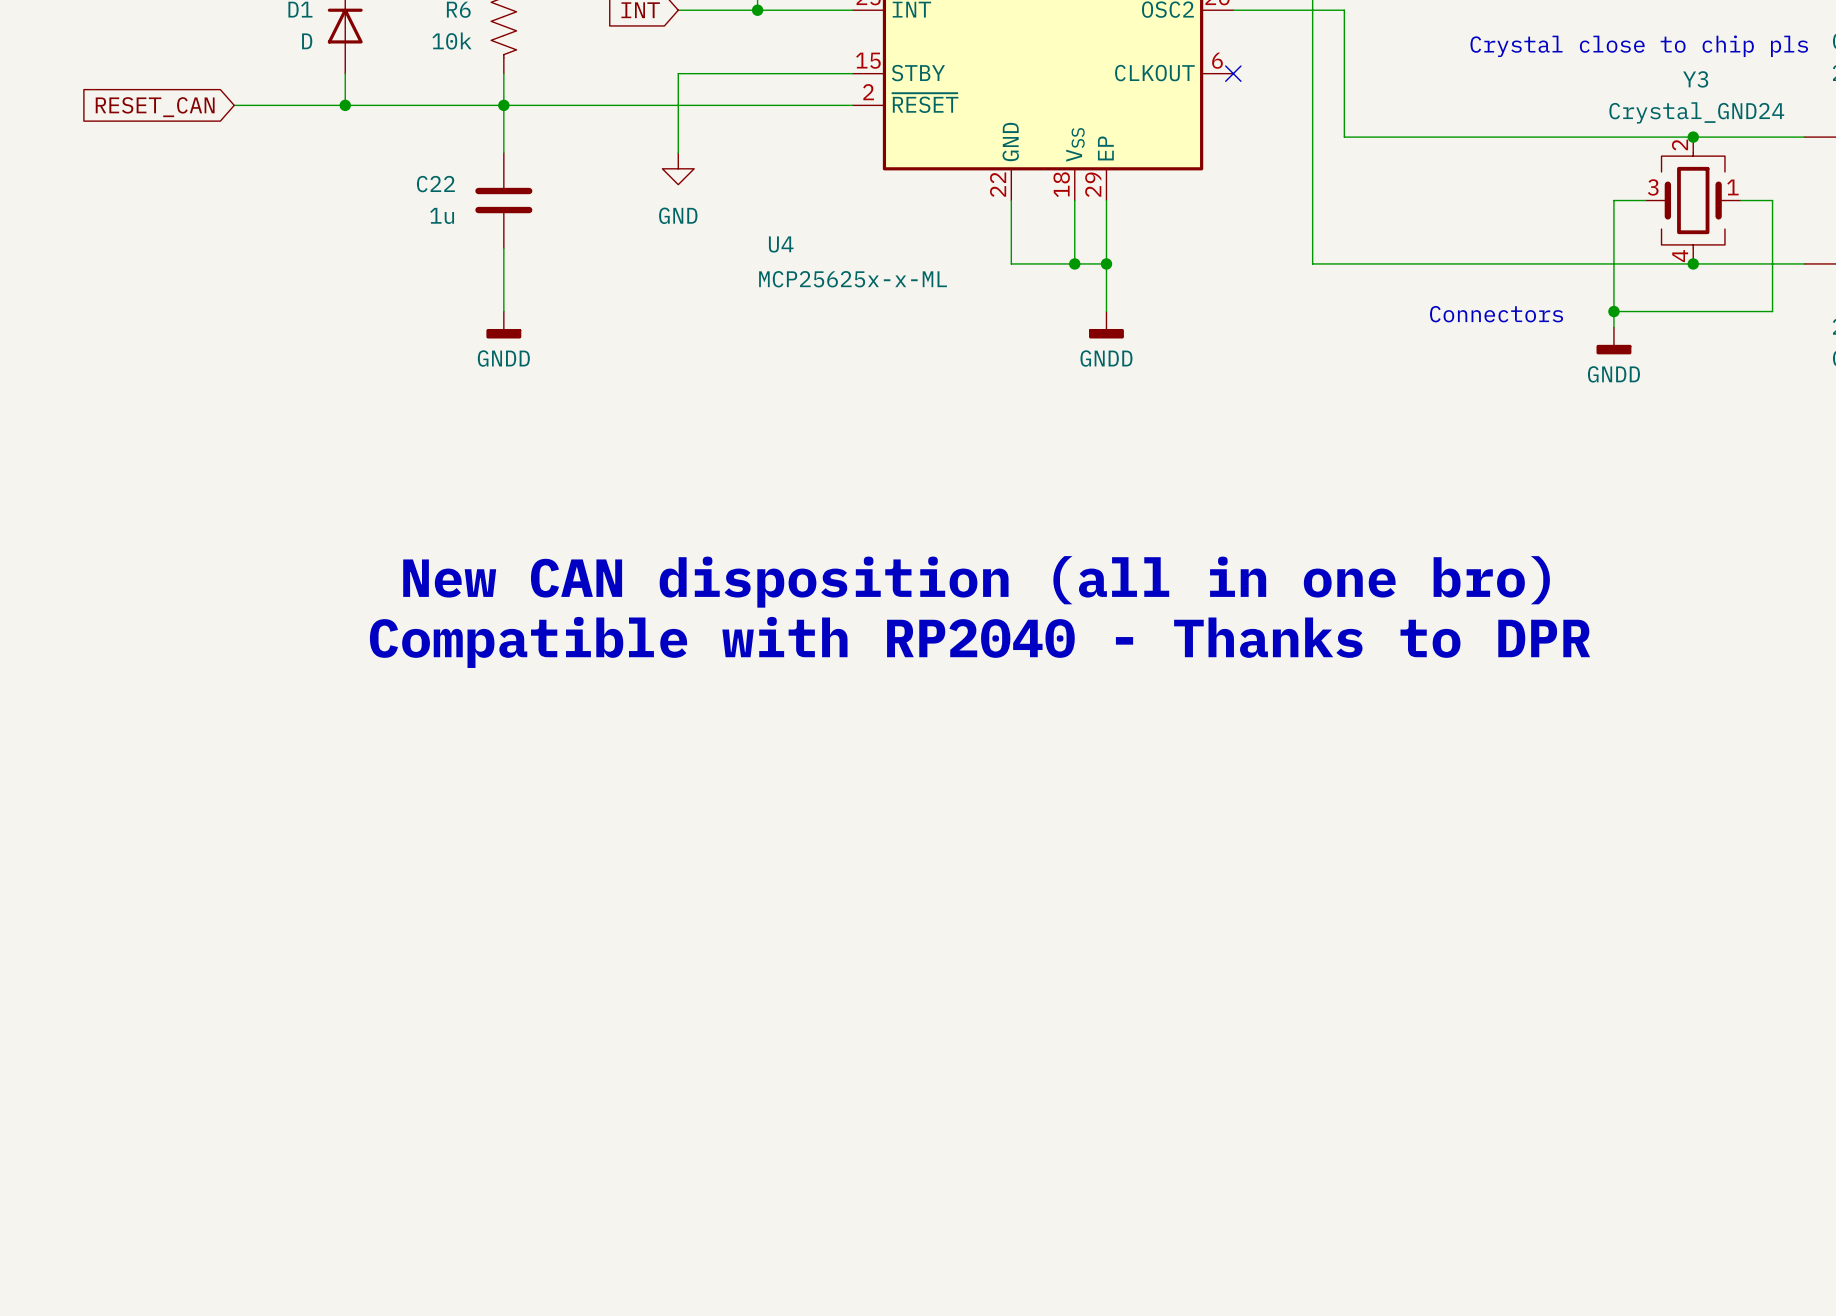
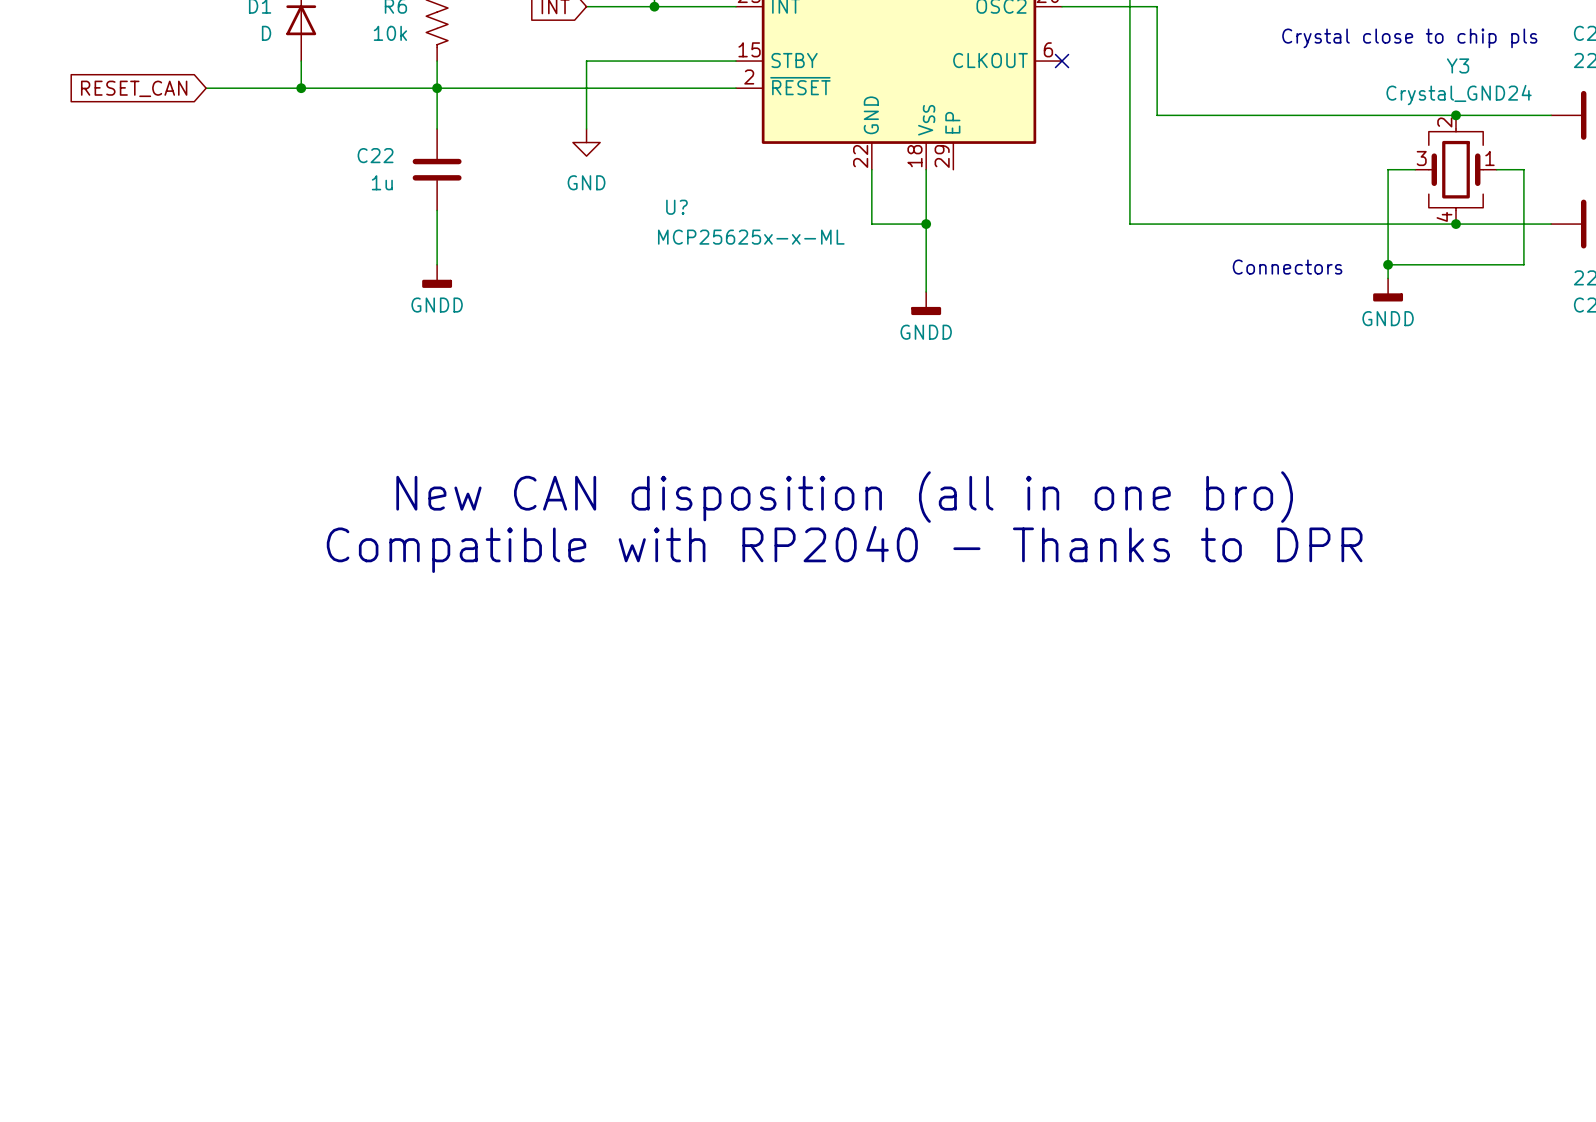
wire: (1106, 200) (1106, 311) -> none
U4 name: U4 (781, 244) -> U? (676, 207)
wire: (1074, 263) (1106, 263) -> (926, 224) (926, 291)
junction: (1106, 263) -> none
power symbol position: GNDD (1106, 325) -> GNDD (926, 303)

